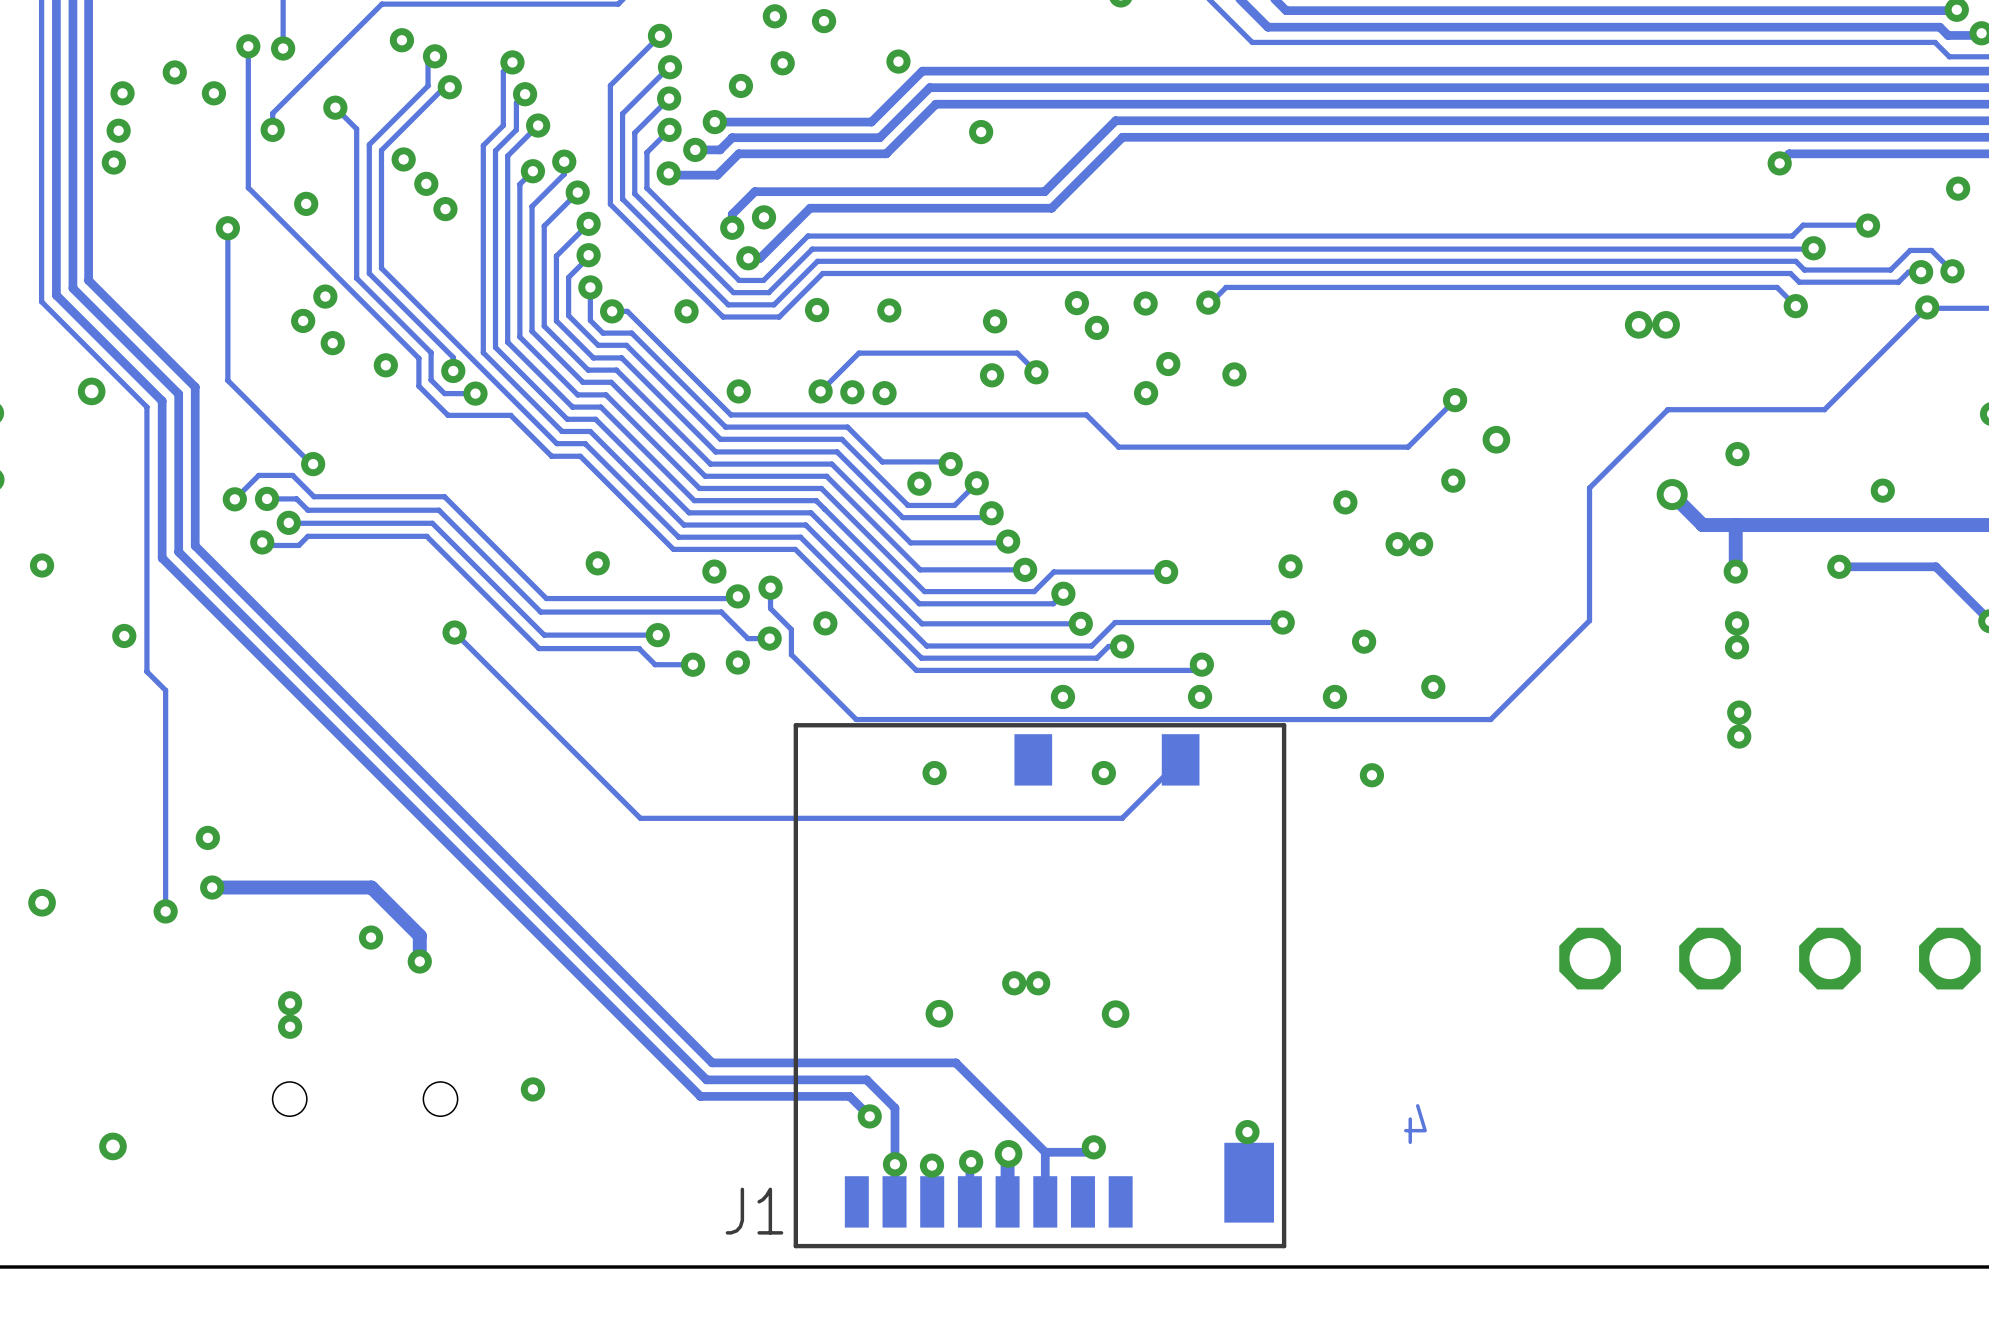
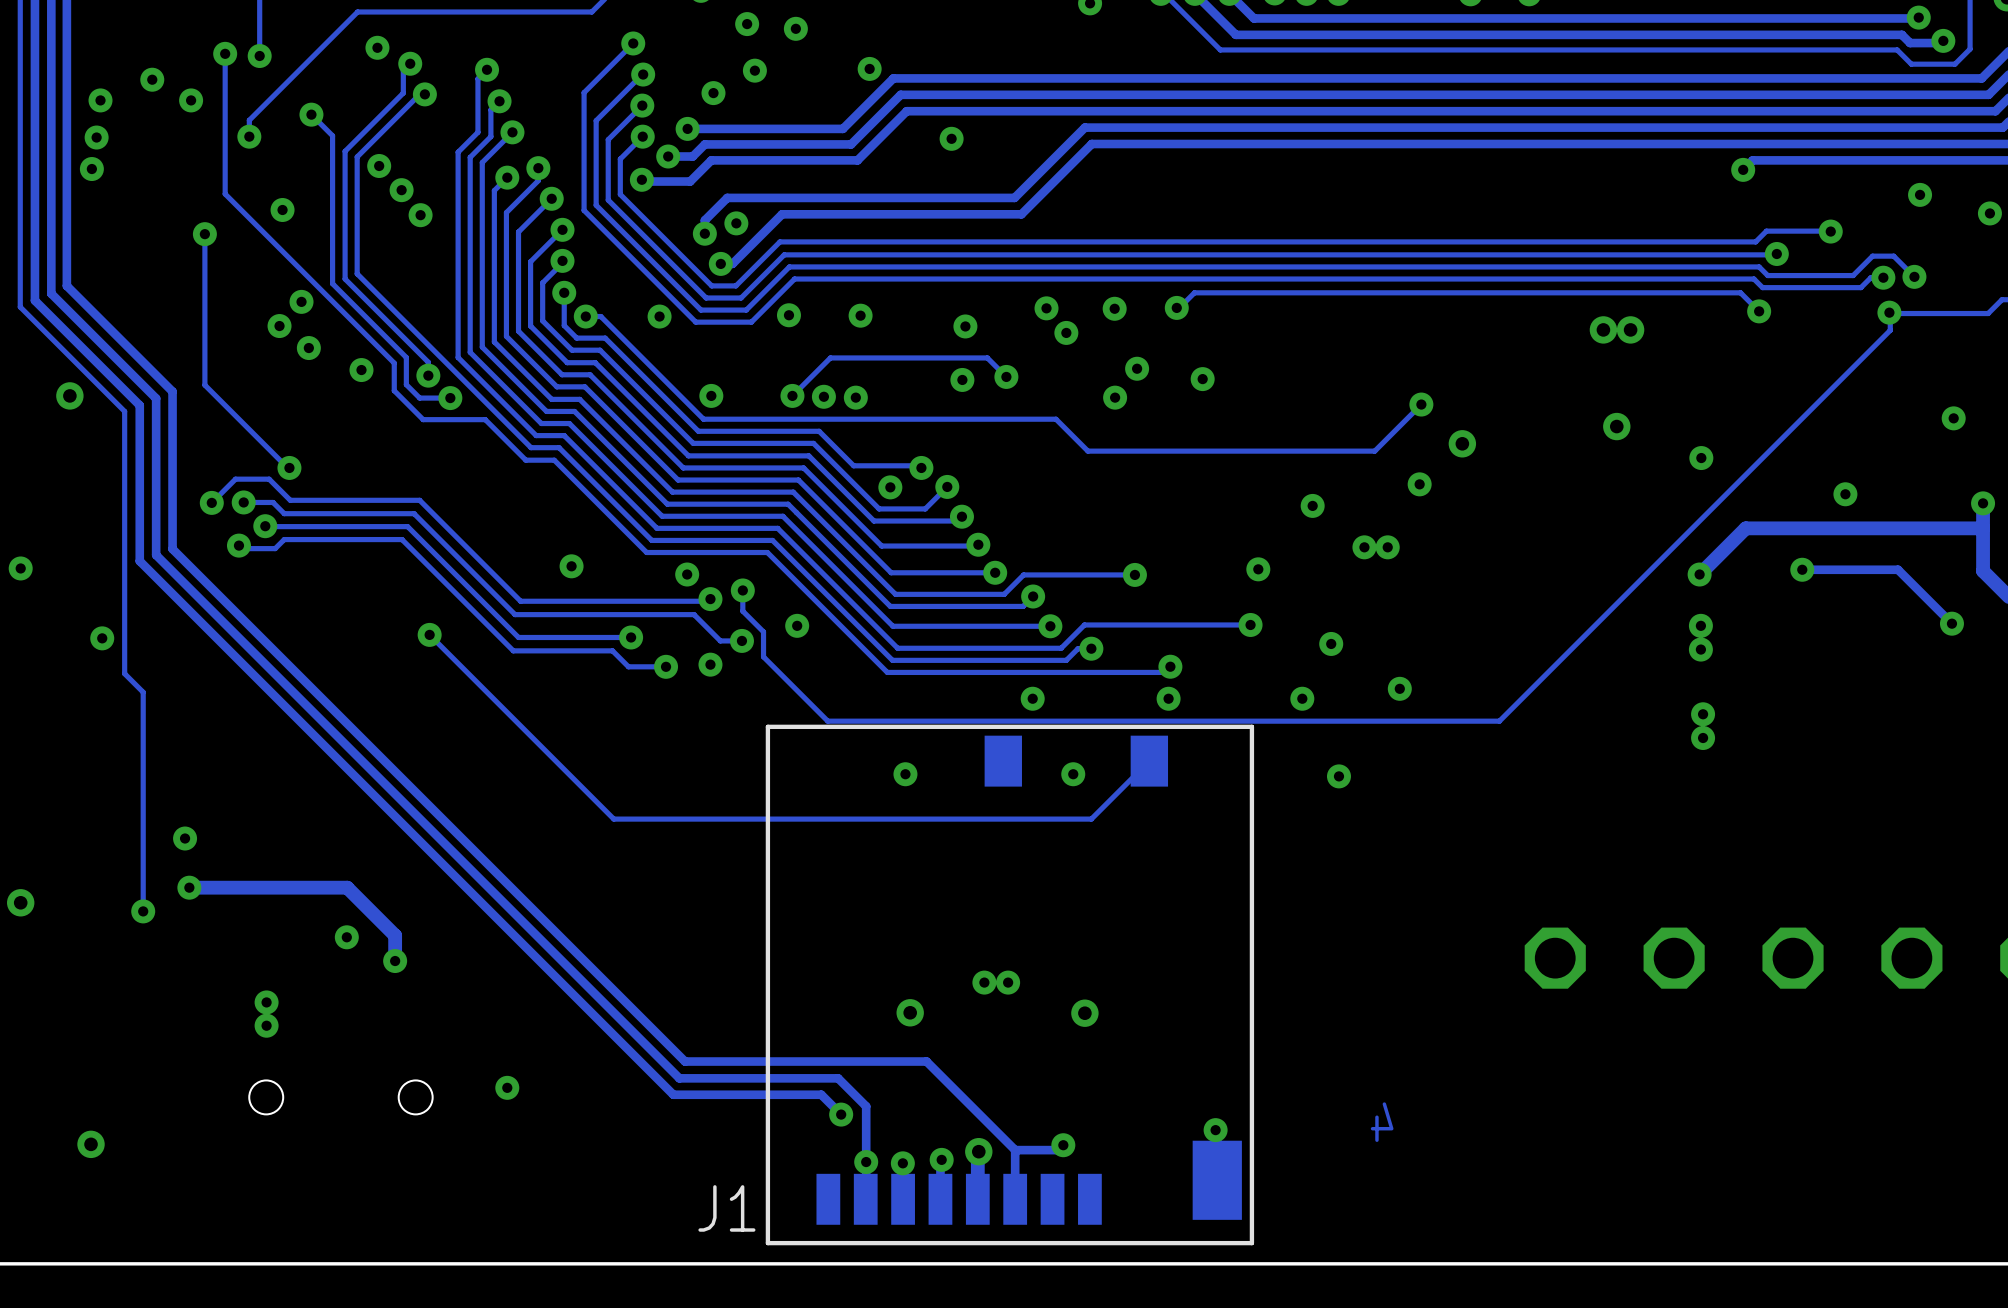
track: (1926, 307) (1824, 409) (1667, 409) (1589, 488) (1589, 620) (1490, 719) -> (1890, 313) (1890, 330) (1499, 721) (1456, 721)
via: none -> (1616, 426)
track: (1672, 494) (1702, 525) (1782, 525) -> none
via: (1672, 494) -> none
track: (1735, 525) (1735, 571) -> (1745, 528) (1699, 574)

